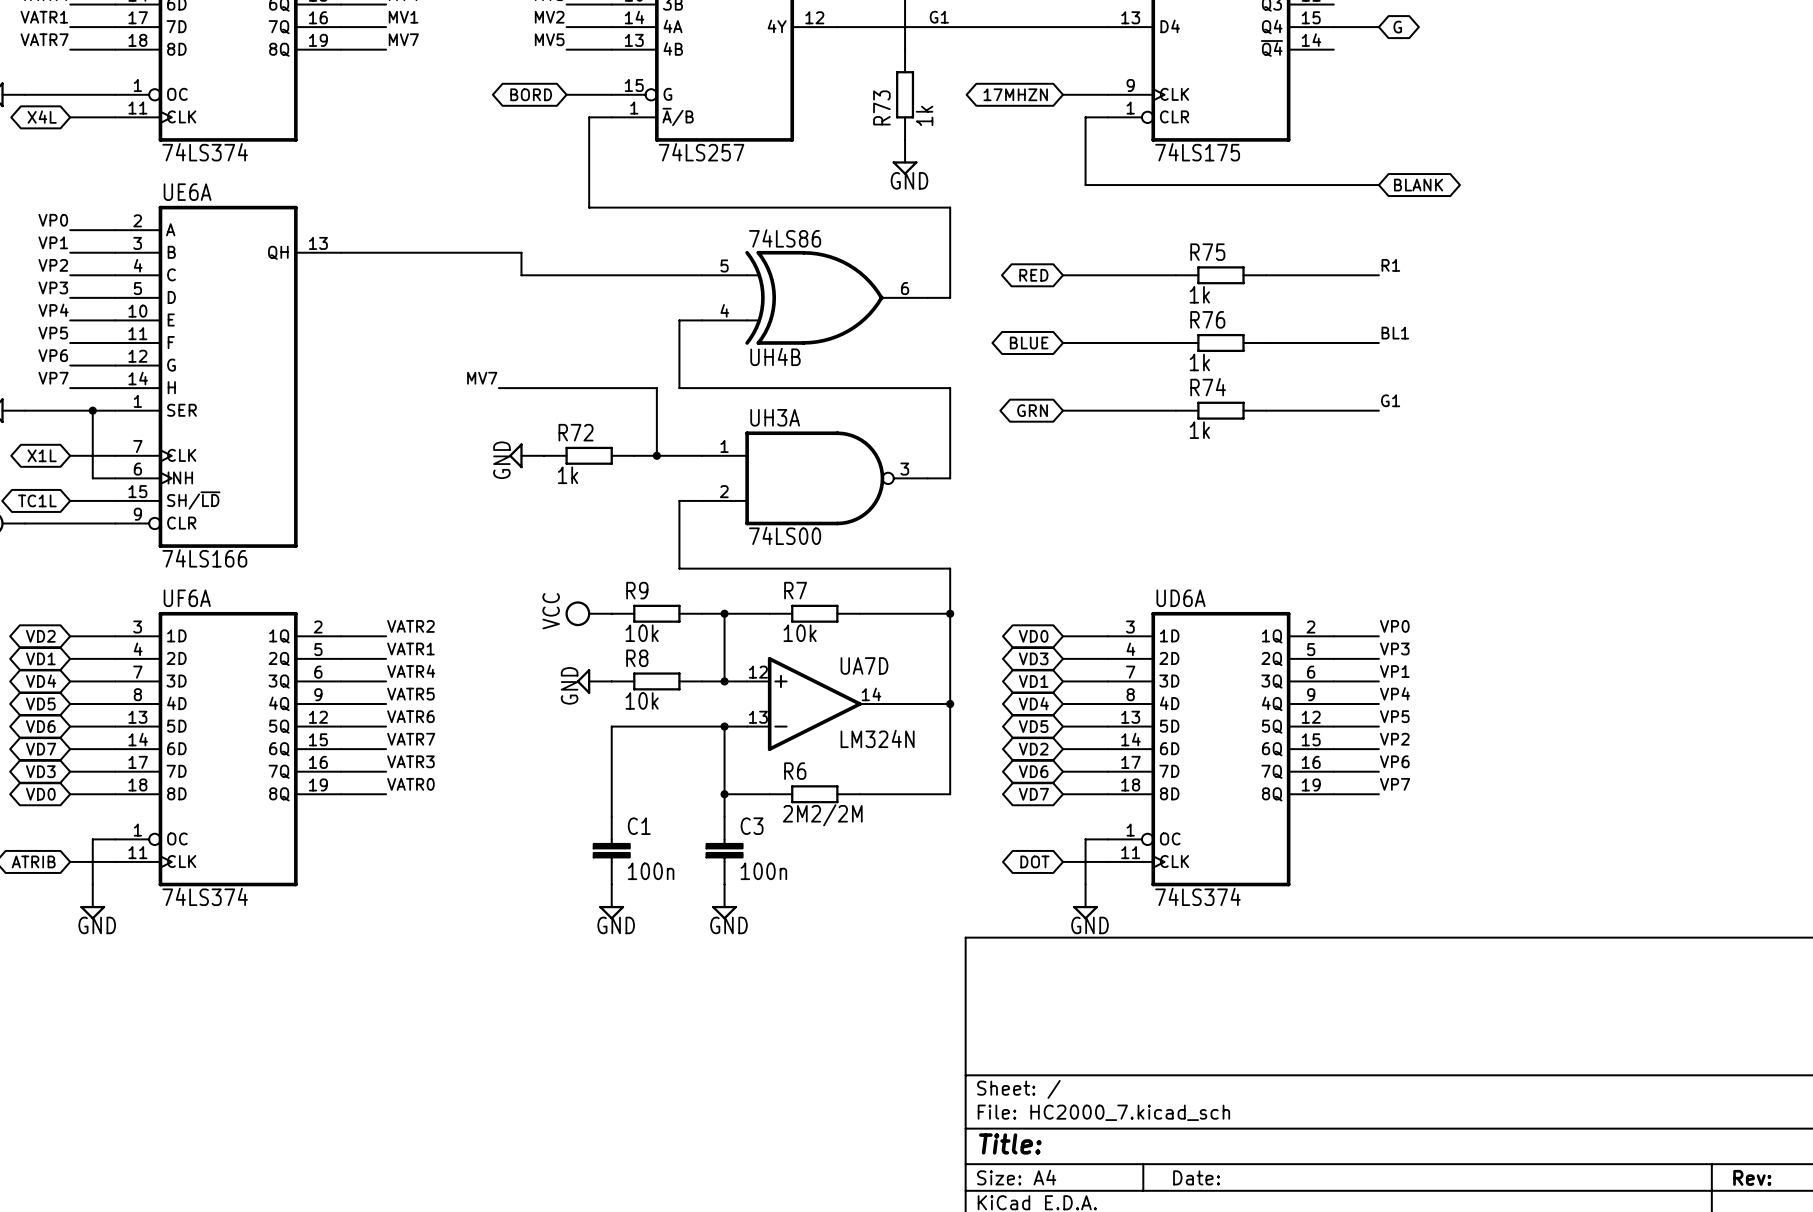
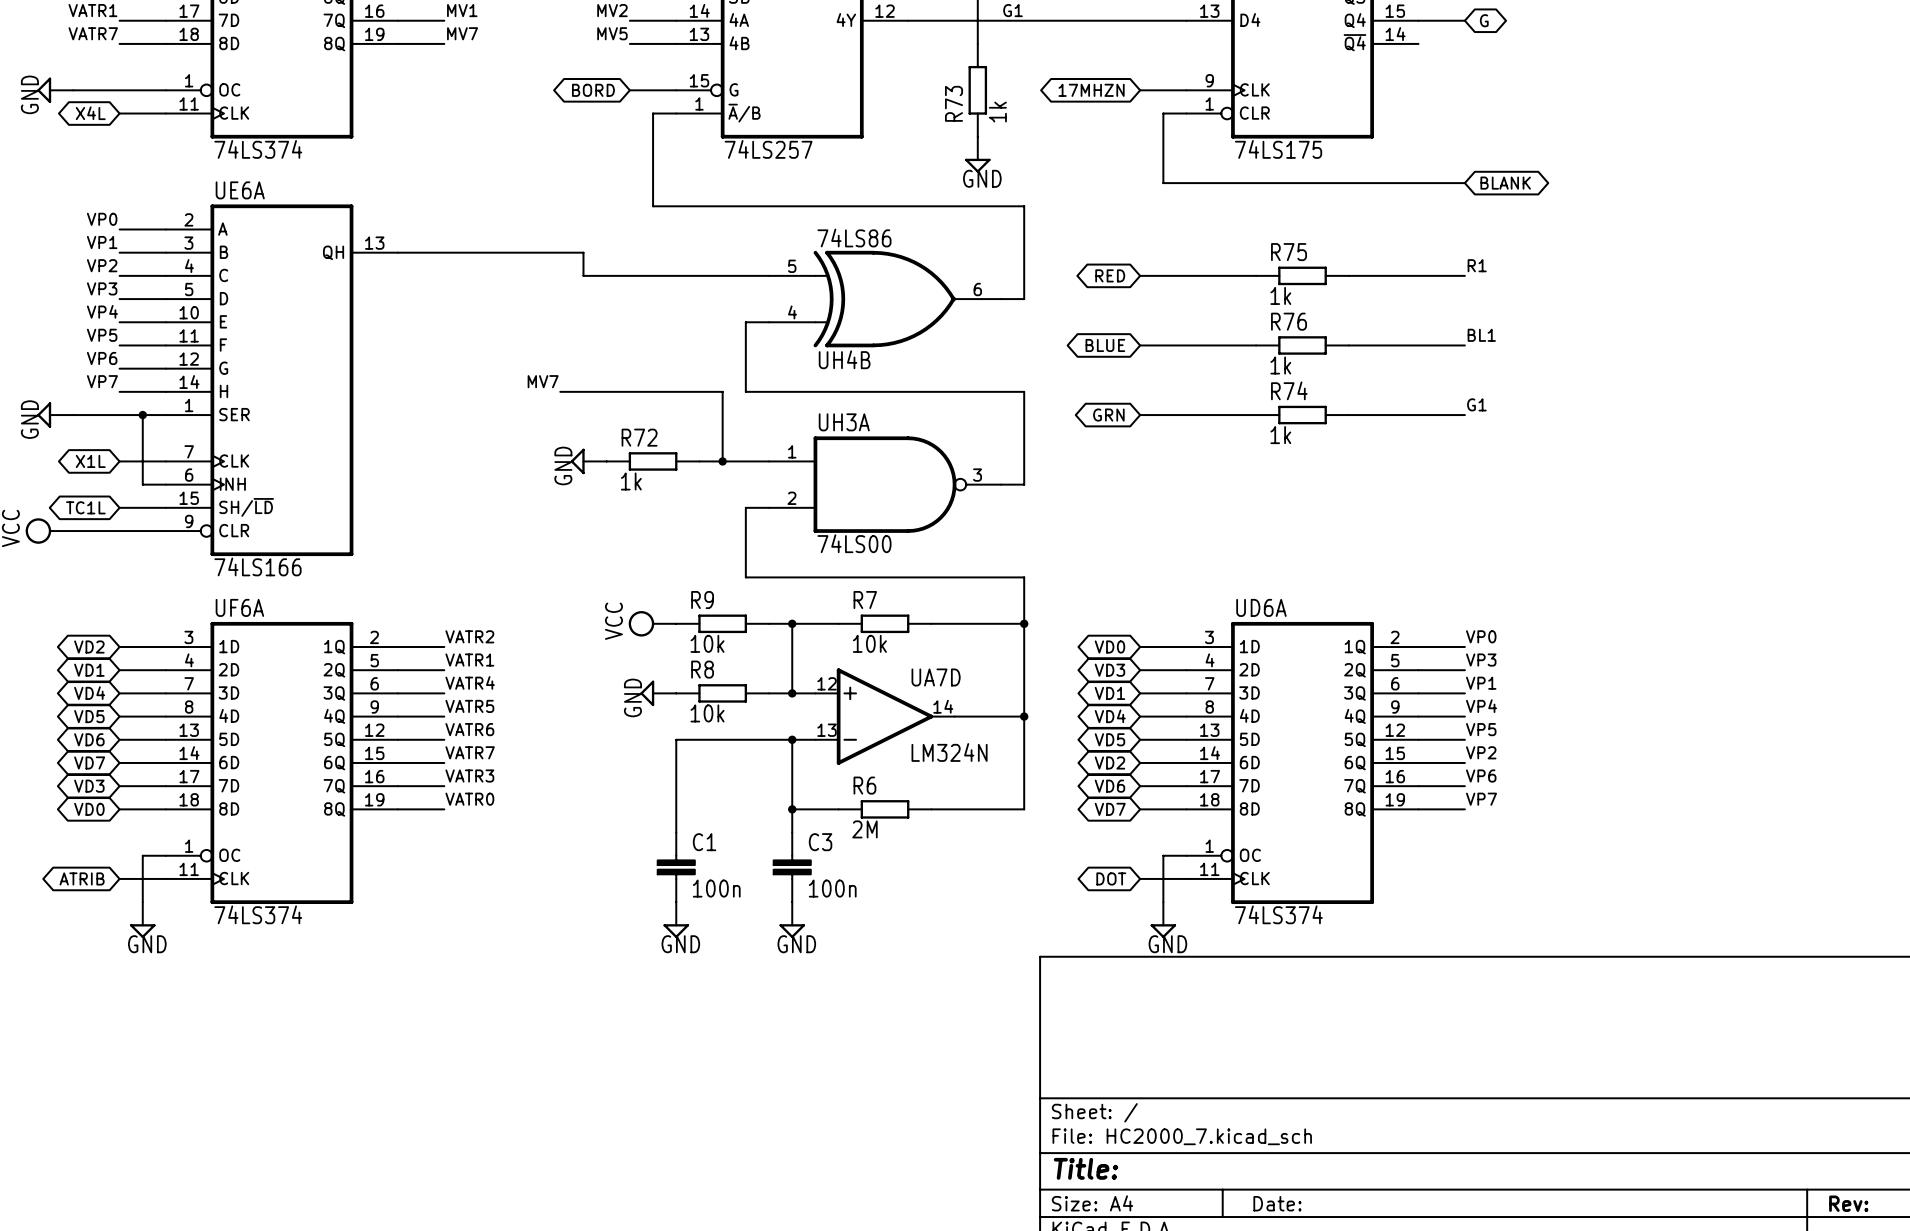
R6 value: 2M2/2M (822, 815) -> 2M (864, 829)

